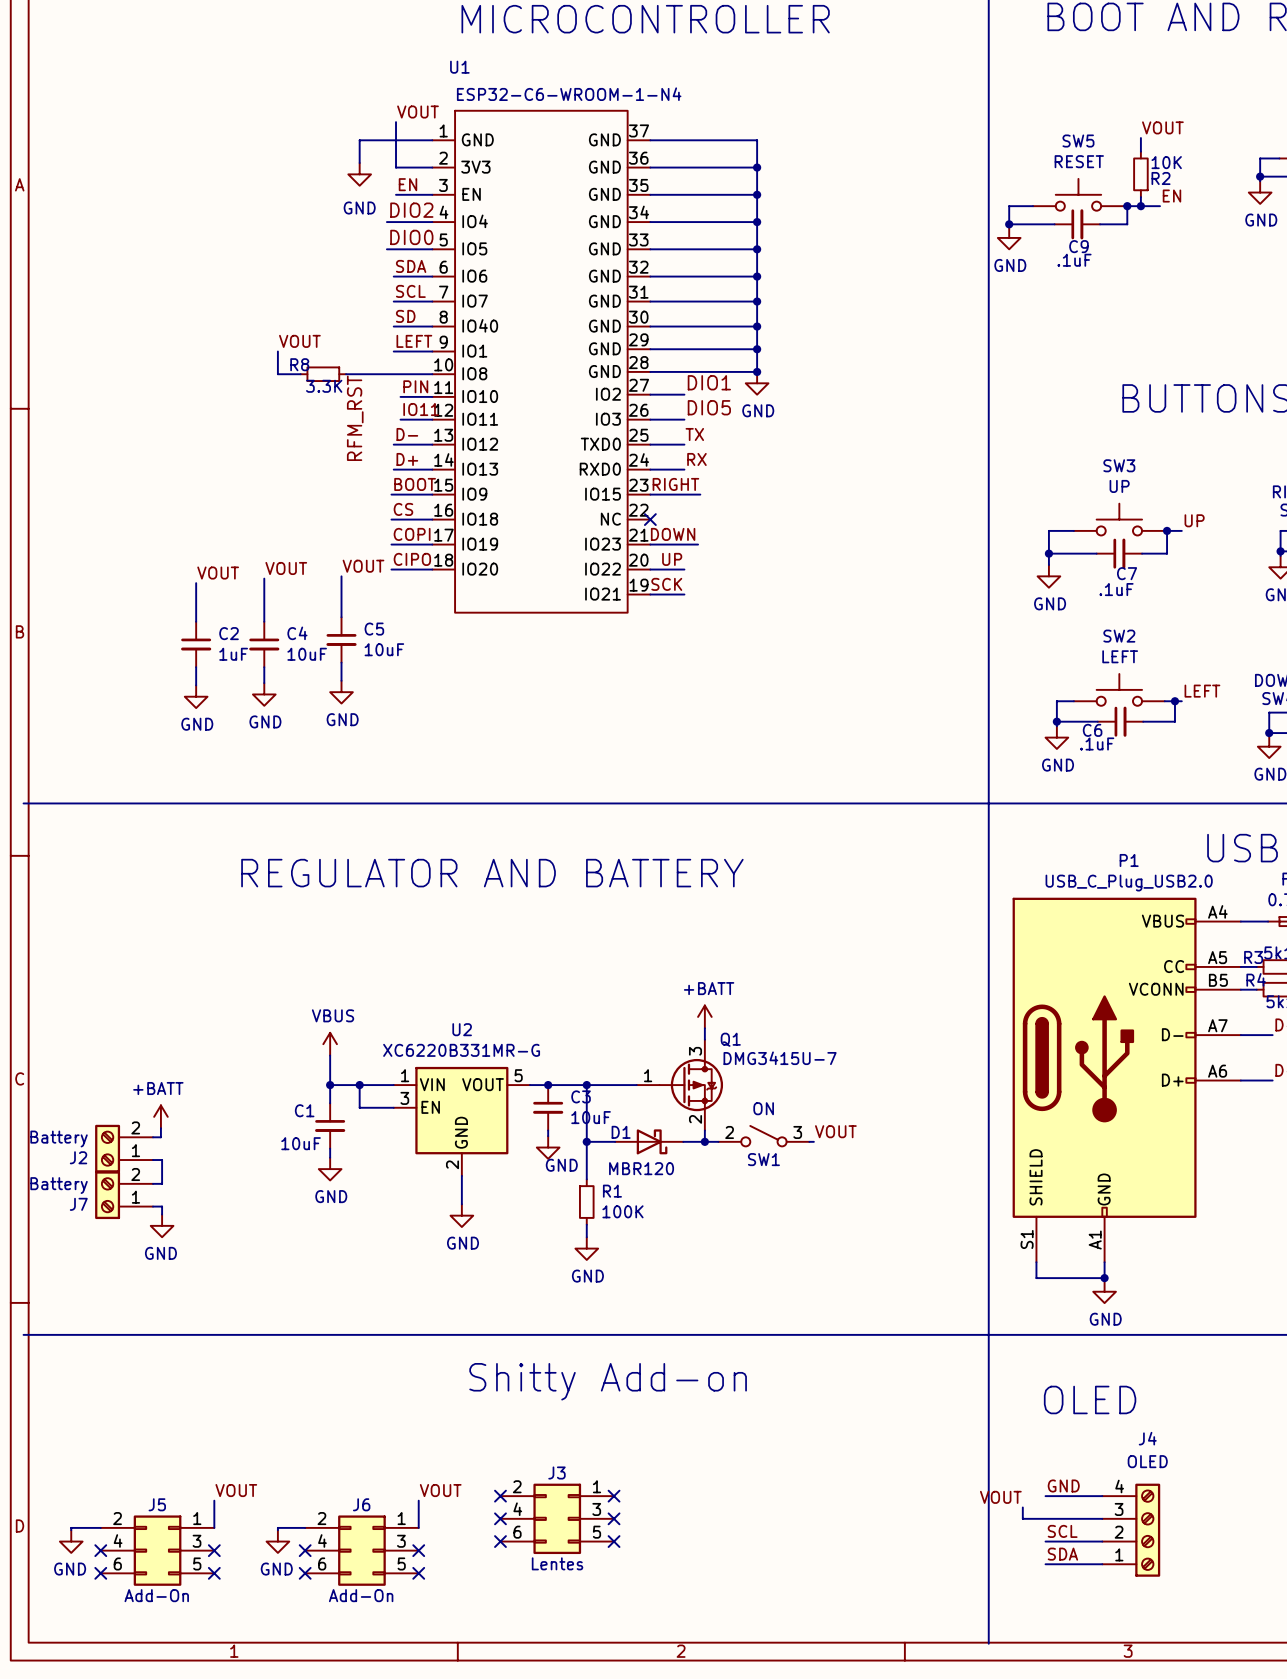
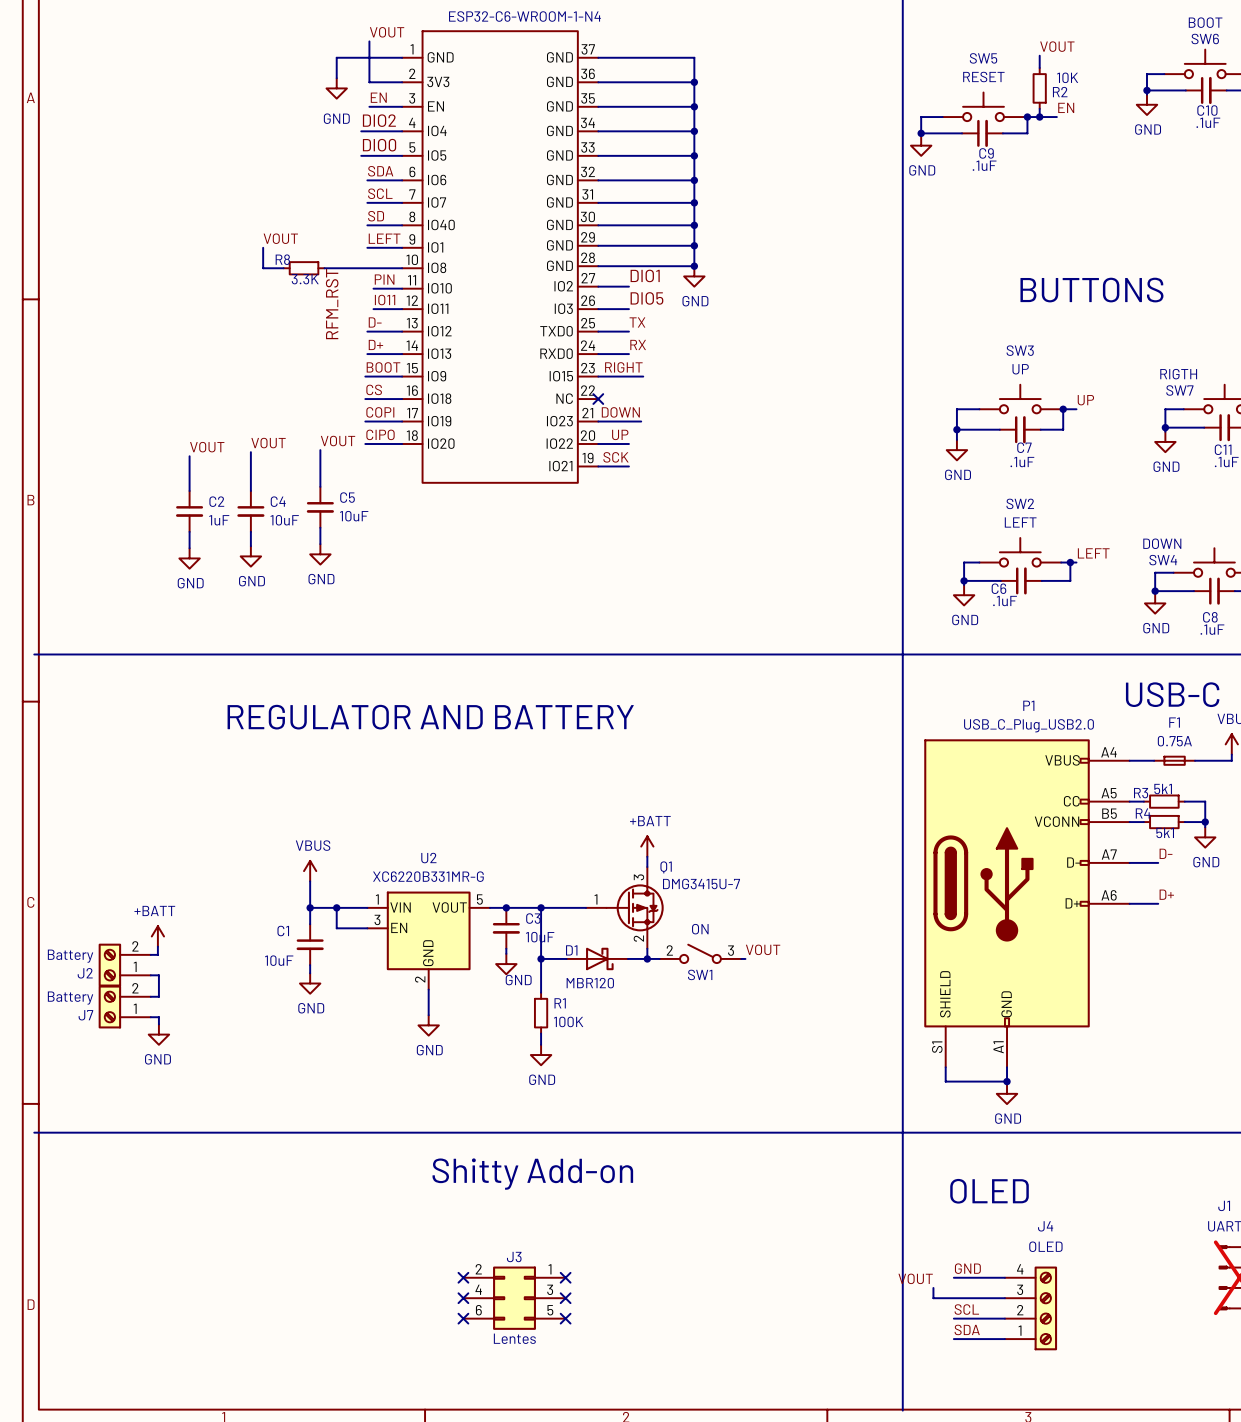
label: VOUT (236, 1490) -> none
label: VOUT (440, 1490) -> none
wire: (214, 1500) (214, 1527) -> none
wire: (418, 1500) (418, 1527) -> none
wire: (100, 1527) (71, 1527) (71, 1530) -> none
wire: (305, 1527) (277, 1527) (277, 1530) -> none
power symbol: GND (71, 1541) -> none
power symbol: GND (277, 1541) -> none
no-connect mark: (100, 1550) -> none
J5: Add-On (157, 1550) -> none
no-connect mark: (214, 1550) -> none
no-connect mark: (305, 1550) -> none
J6: Add-On (361, 1550) -> none
no-connect mark: (418, 1550) -> none
no-connect mark: (100, 1573) -> none
no-connect mark: (214, 1573) -> none
no-connect mark: (305, 1573) -> none
no-connect mark: (418, 1573) -> none

